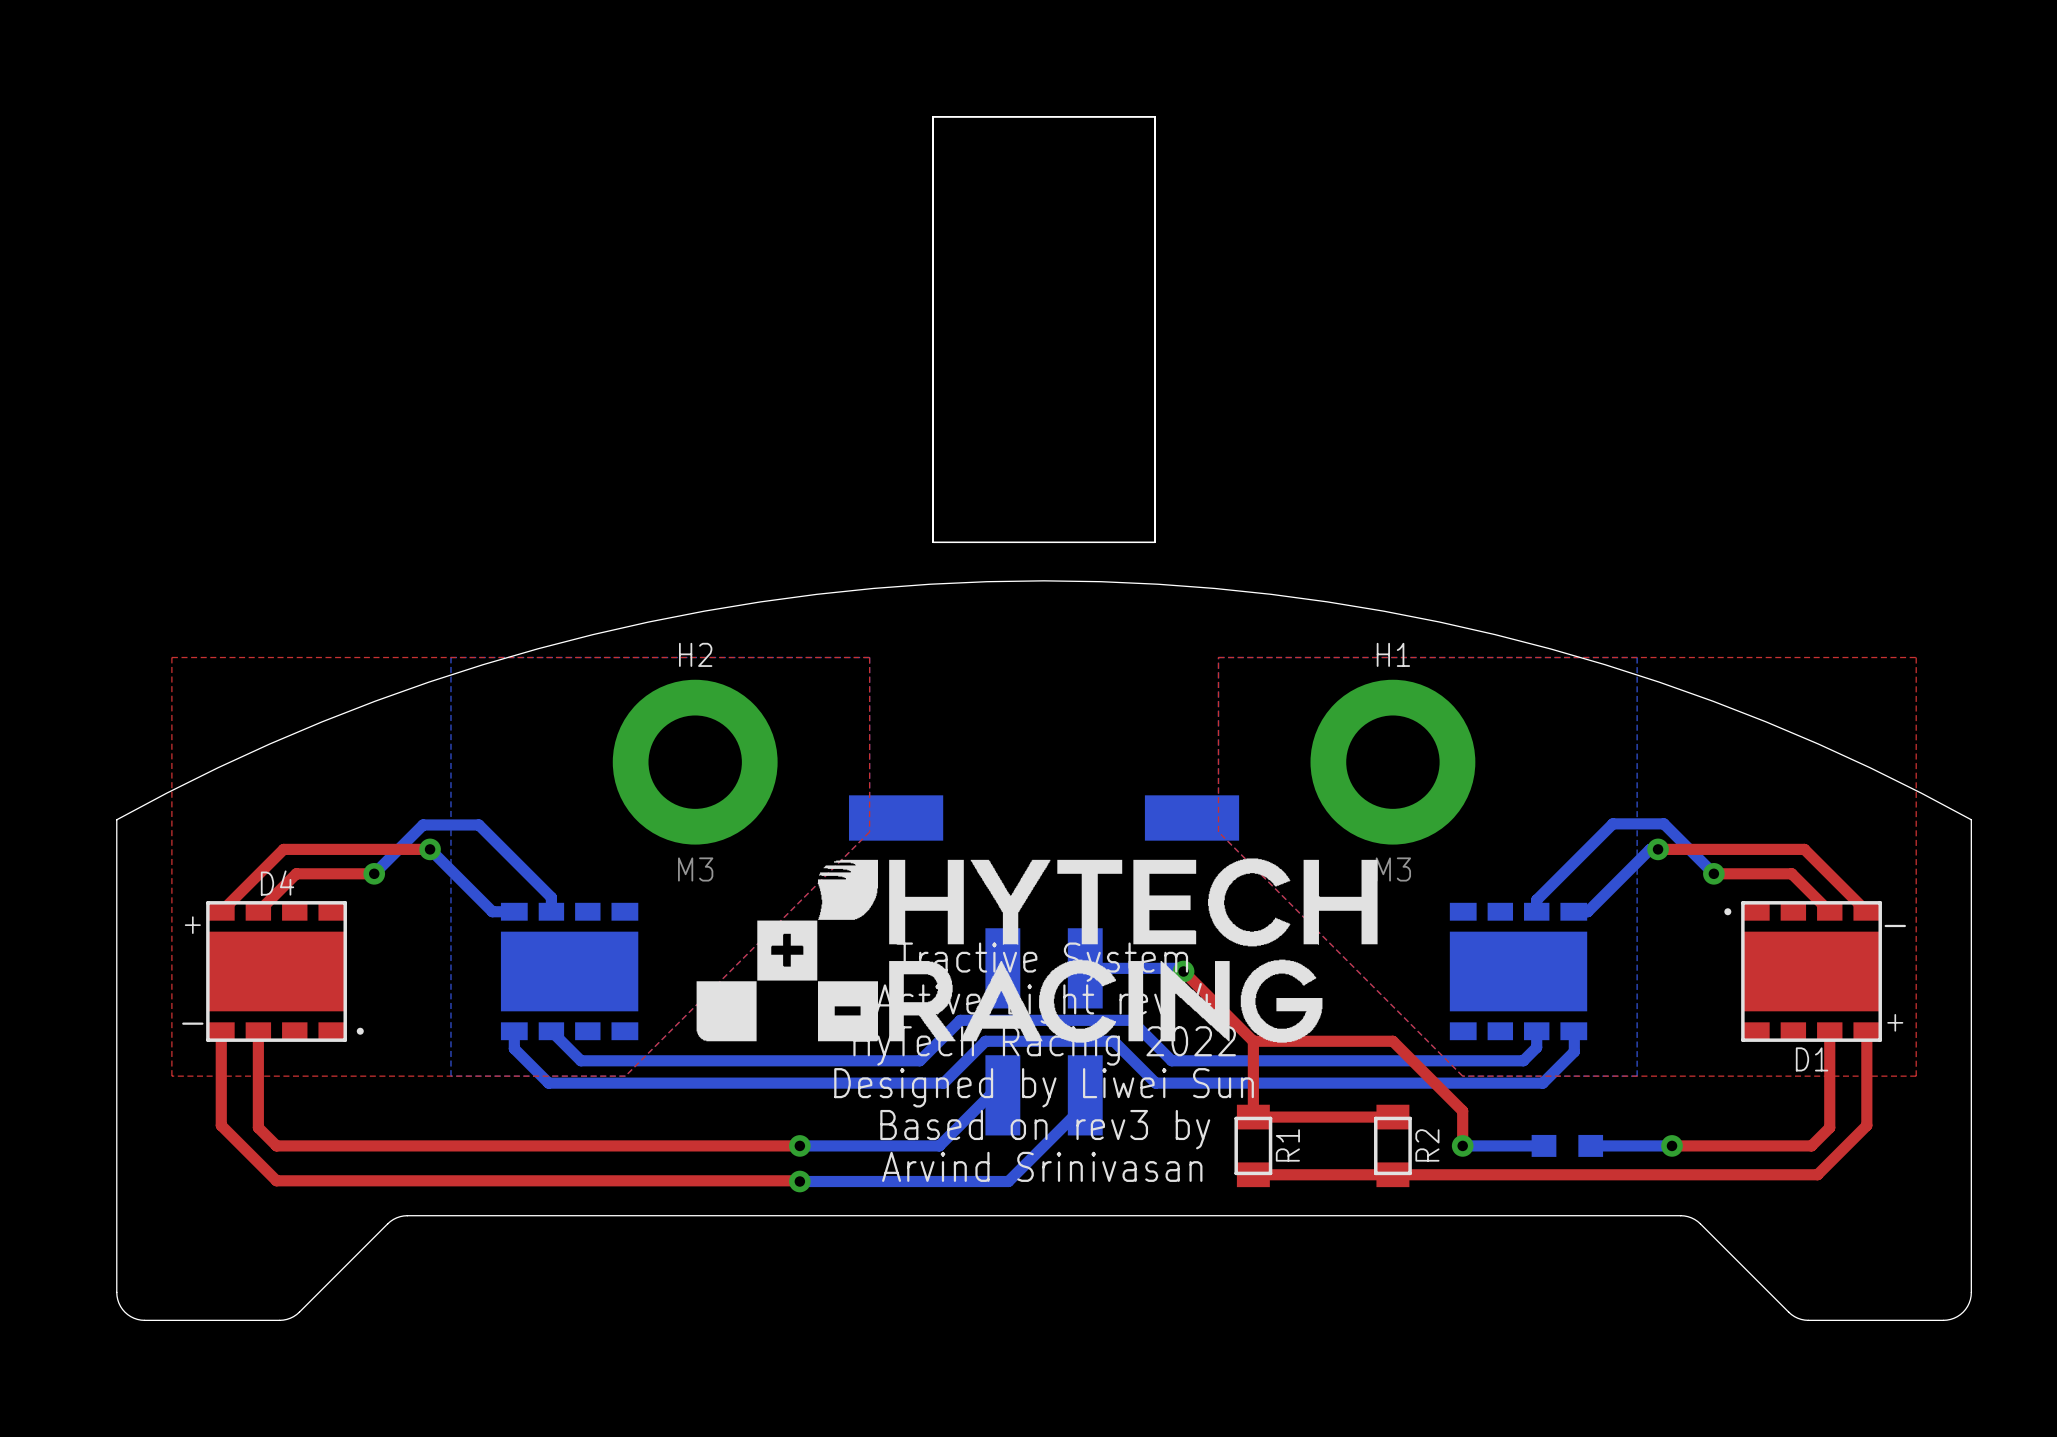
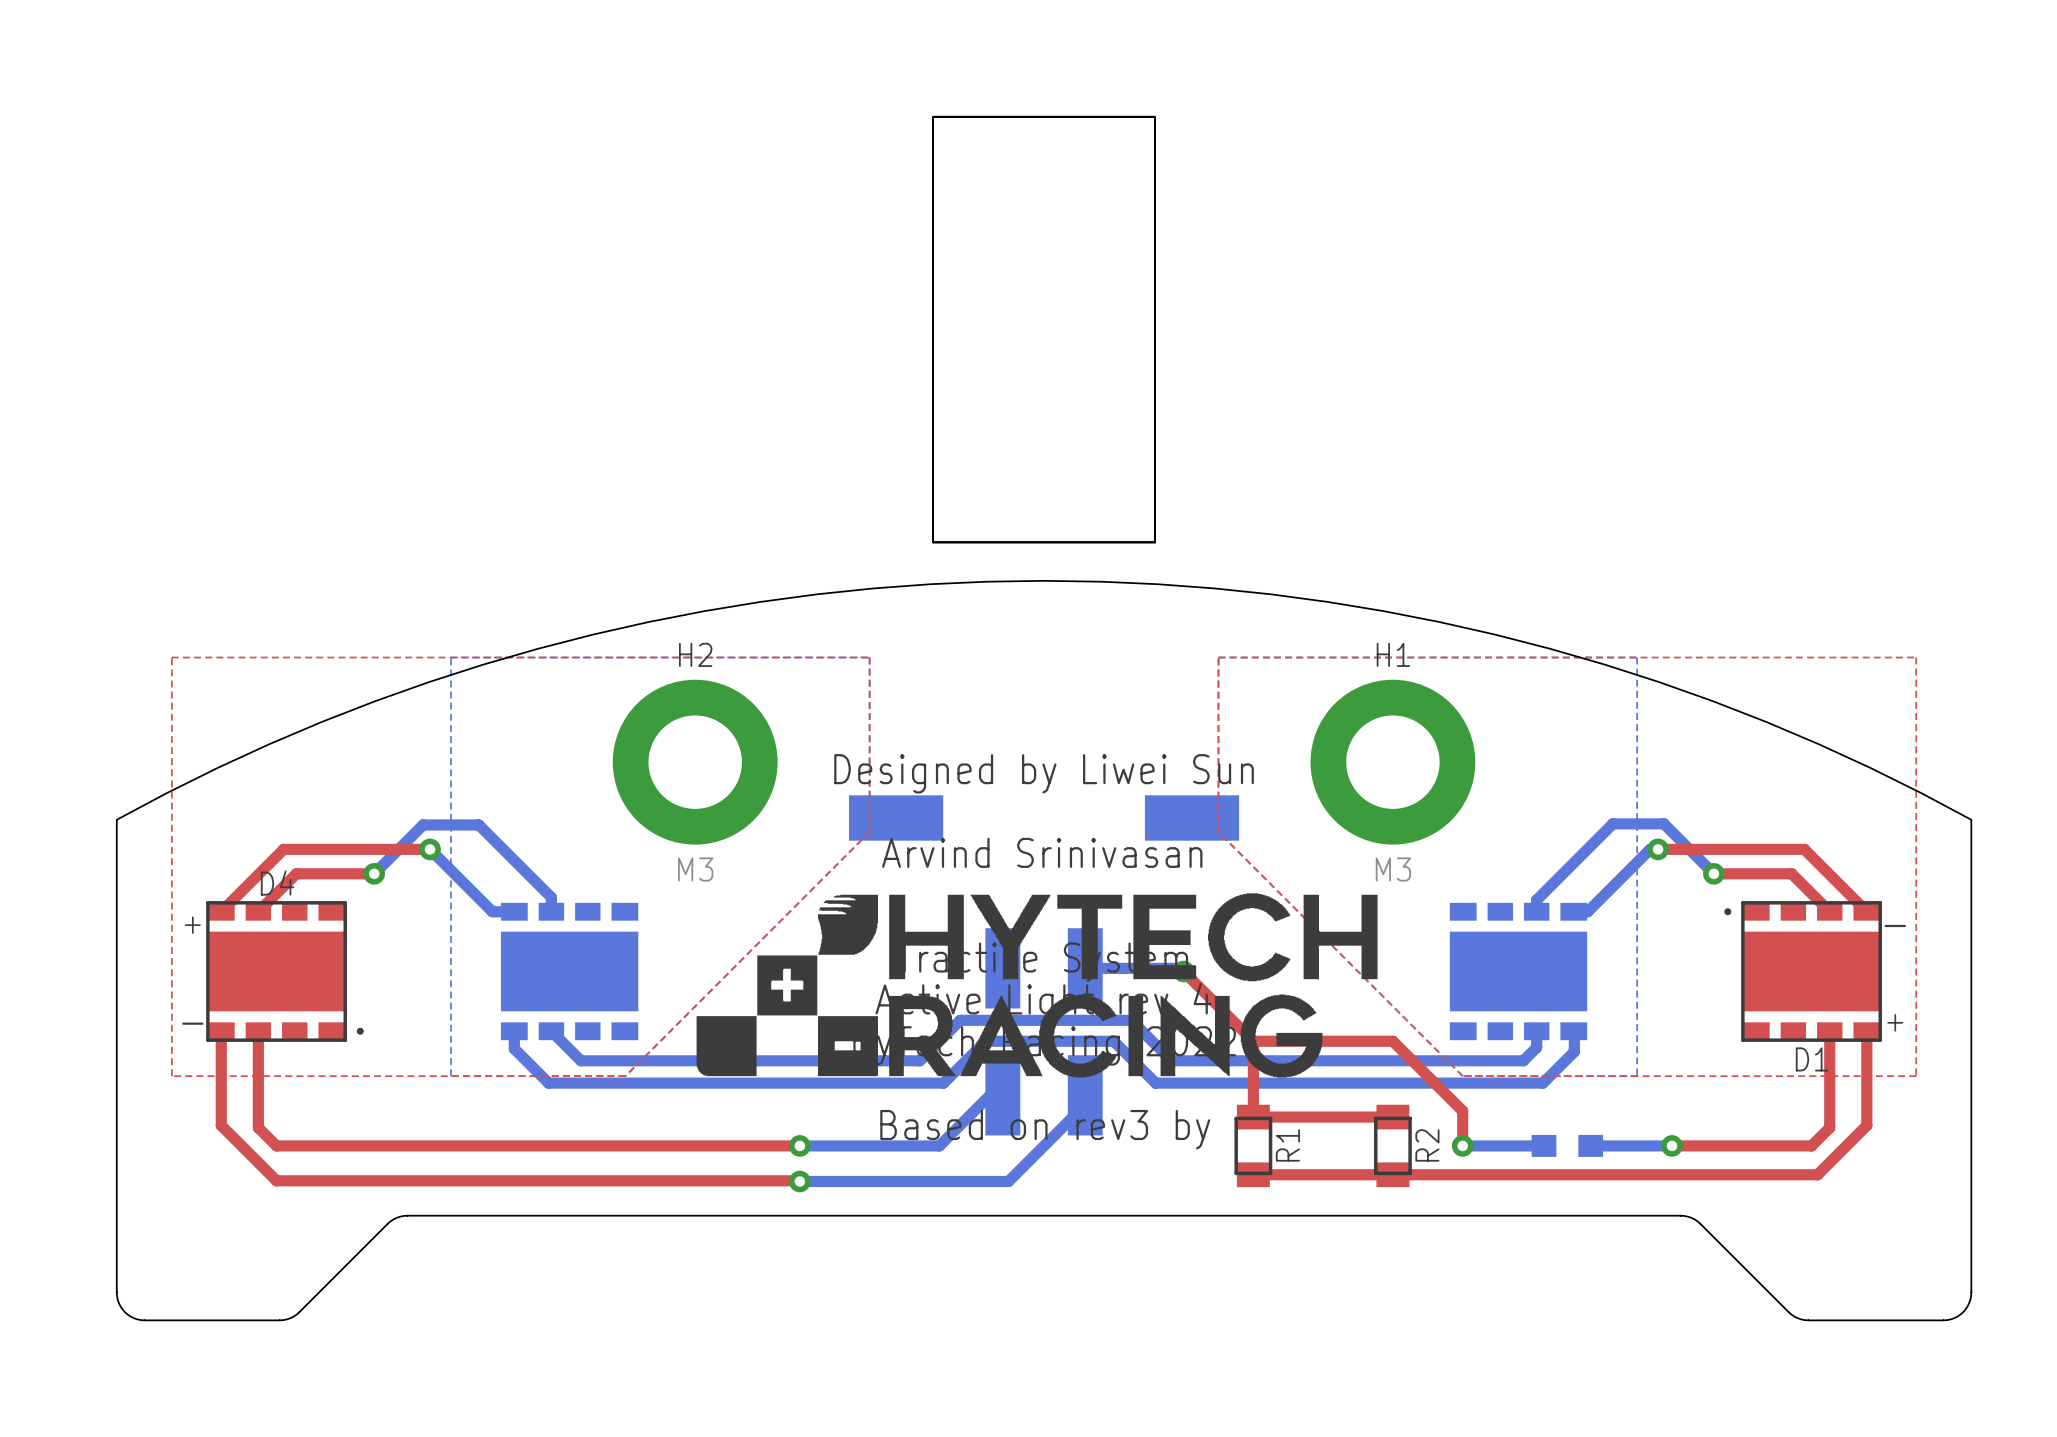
drawing position: (1037, 950) -> (1037, 985)
text position: Designed by Liwei Sun (1044, 1087) -> Designed by Liwei Sun (1044, 773)
text position: Arvind Srinivasan (1042, 1166) -> Arvind Srinivasan (1042, 852)

